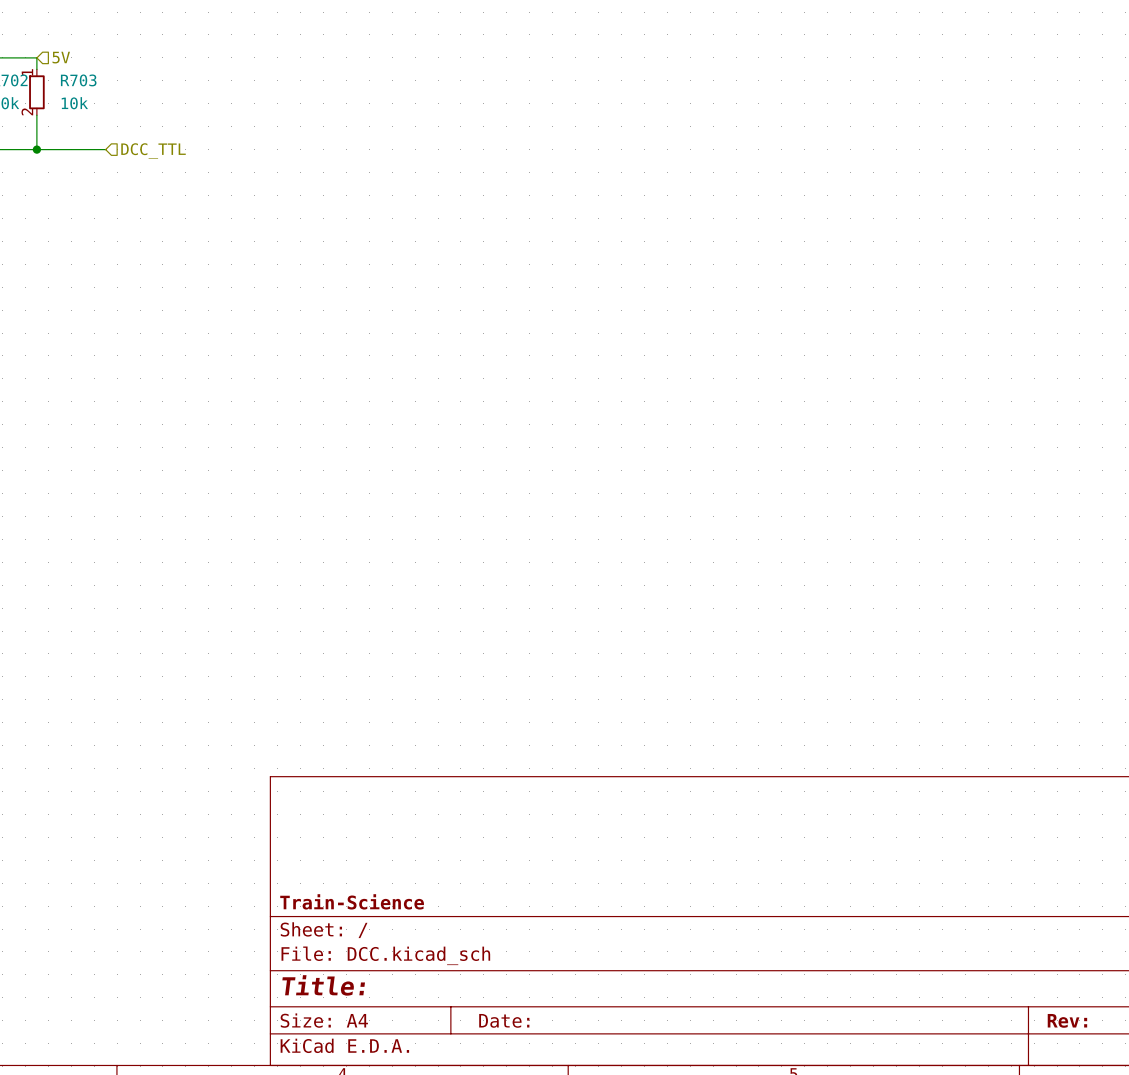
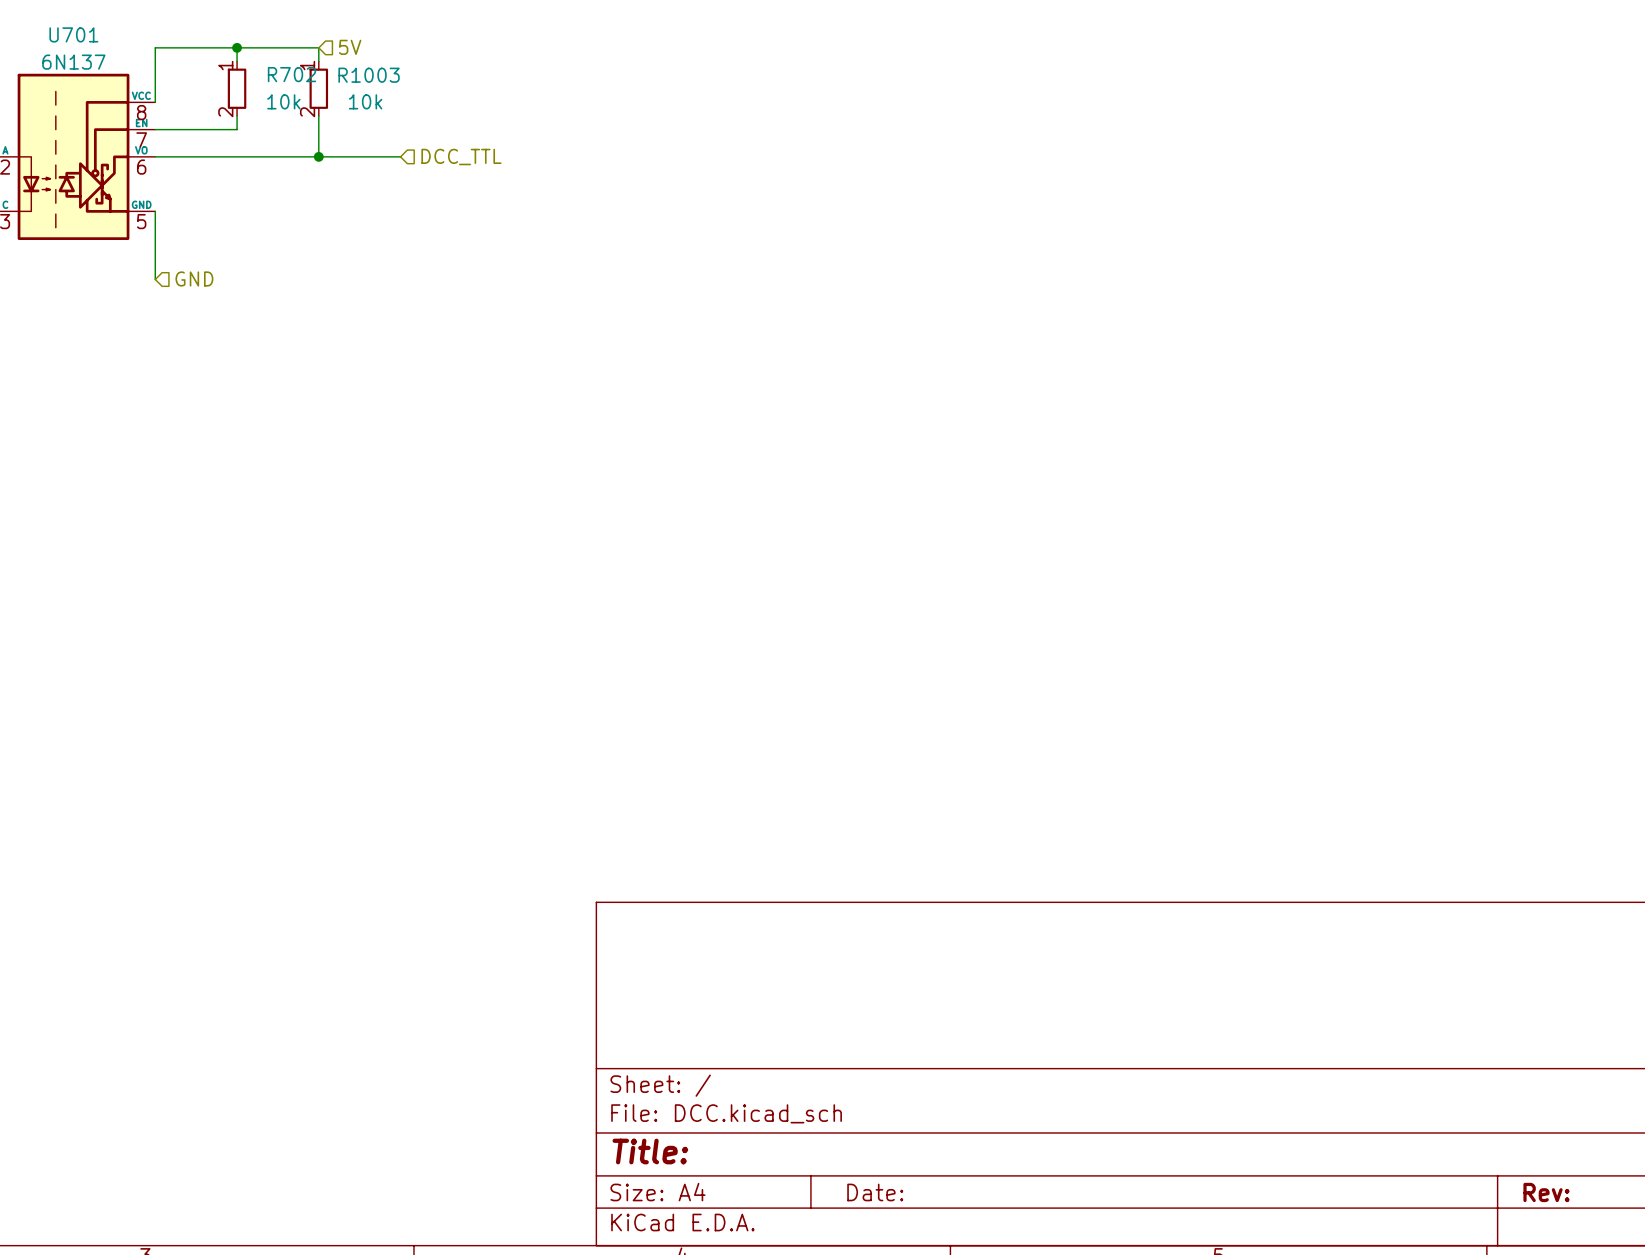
R703 name: R703 (78, 80) -> R1003 (369, 75)
title block: Train-Science (352, 901) -> none

